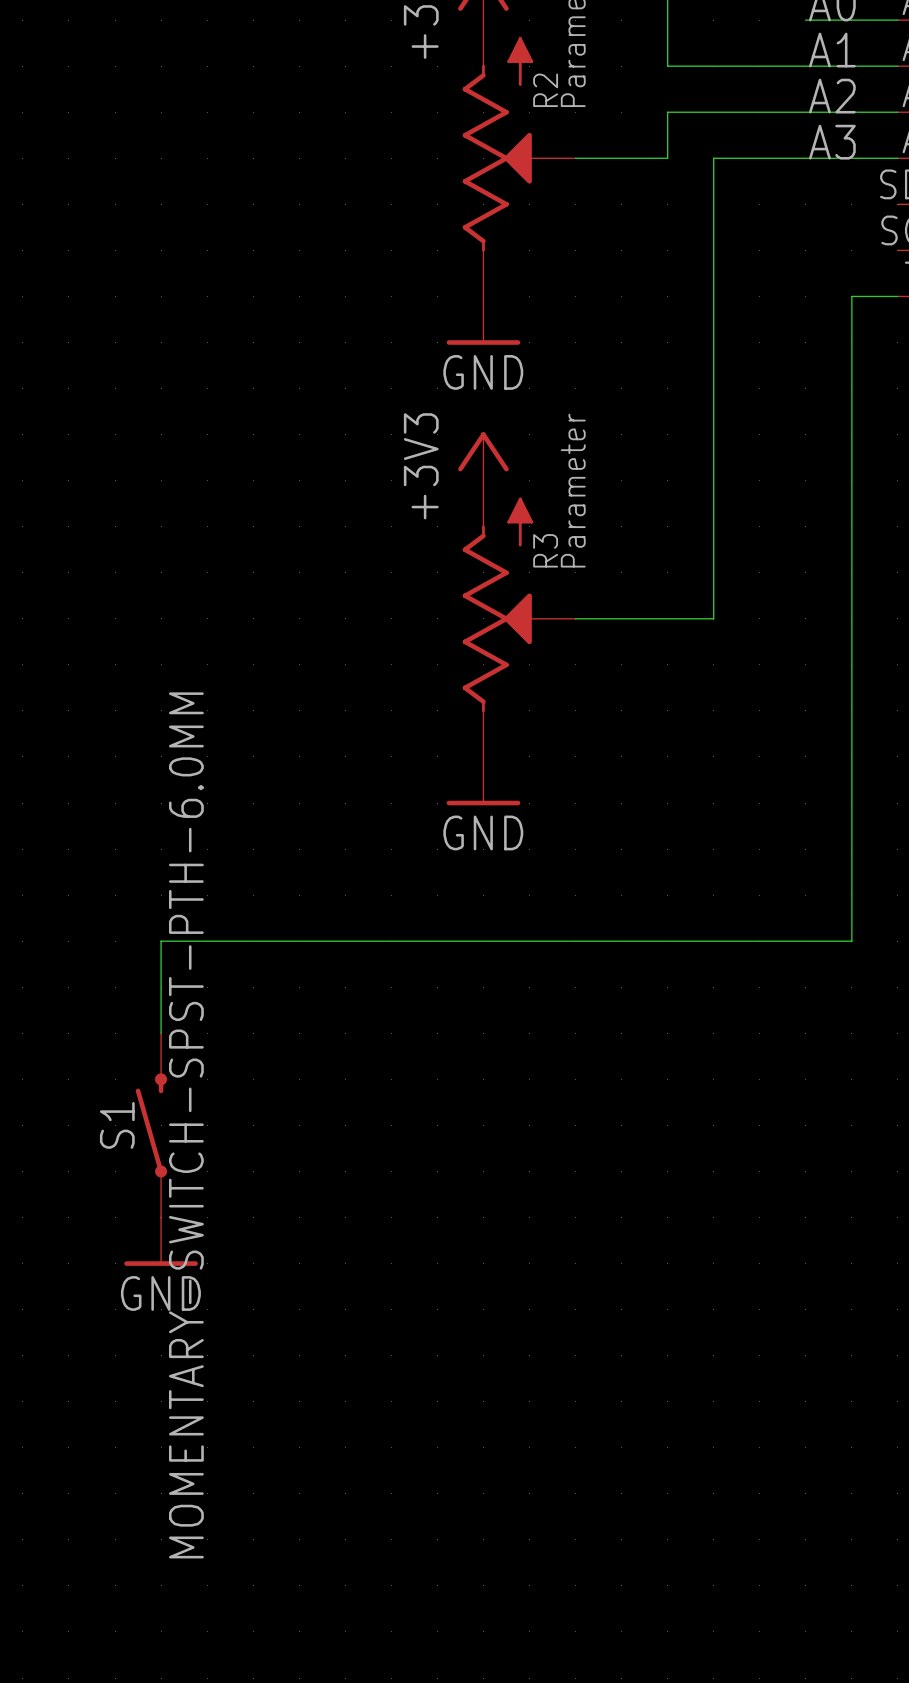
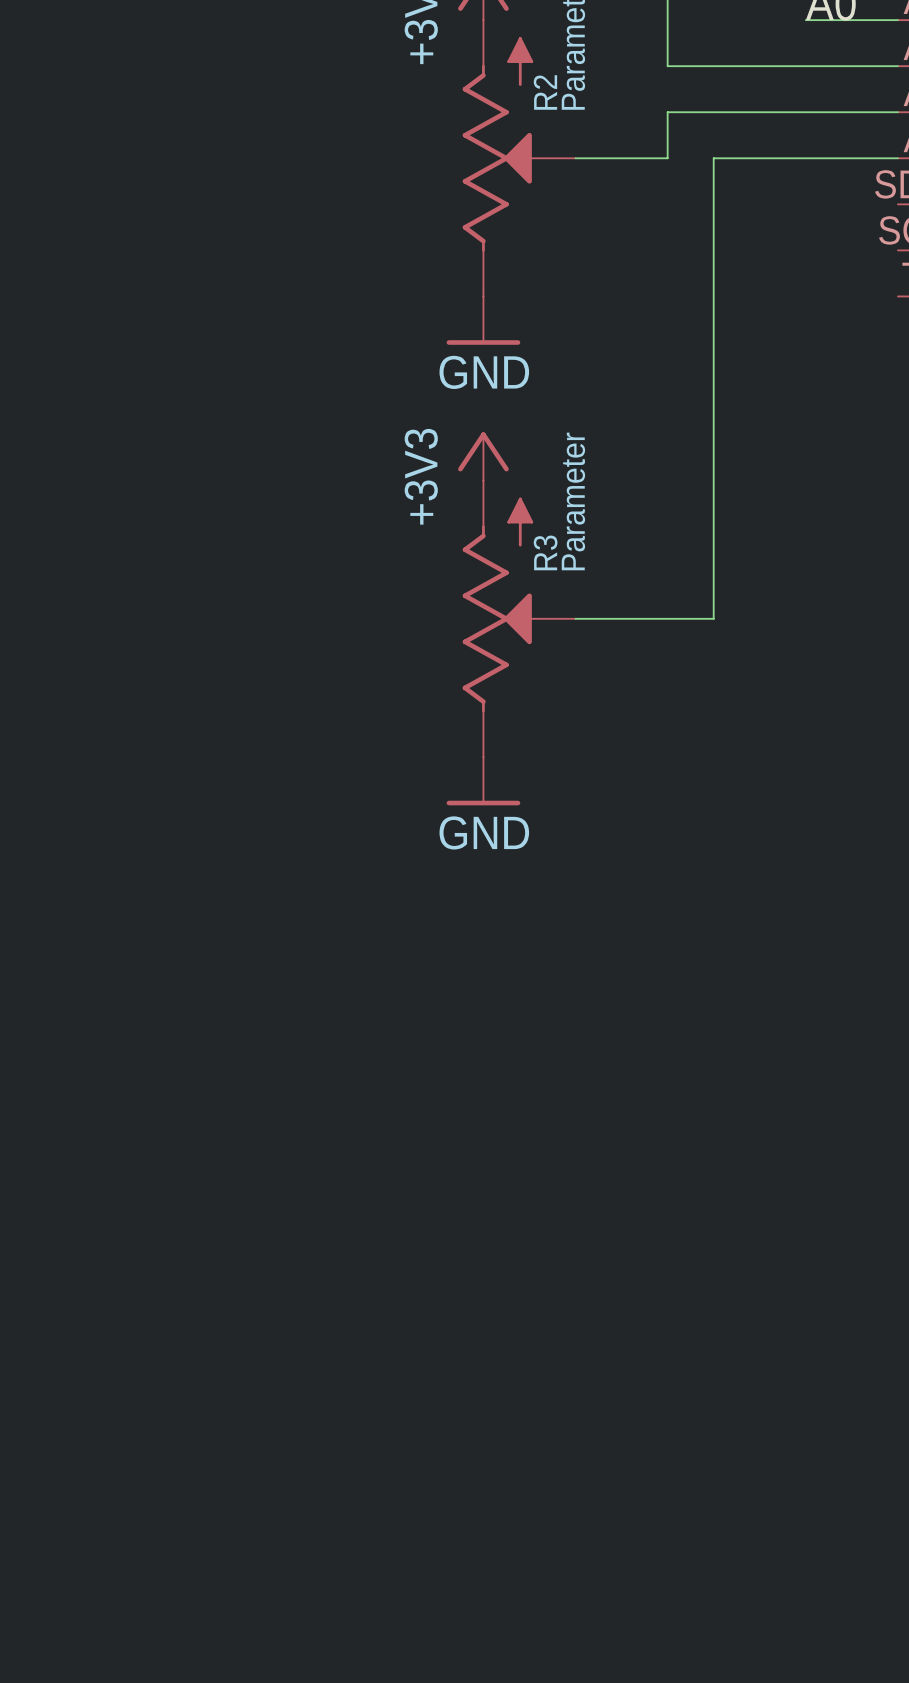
label: A1 (832, 50) -> none
label: A2 (832, 96) -> none
label: A3 (832, 142) -> none
wire: (897, 296) (851, 296) (851, 941) (161, 941) (161, 1033) -> none
S1: MOMENTARY-SWITCH-SPST-PTH-6.0MM (151, 1125) -> none
power symbol: GND (161, 1241) -> none

